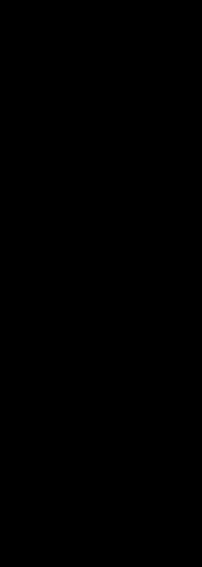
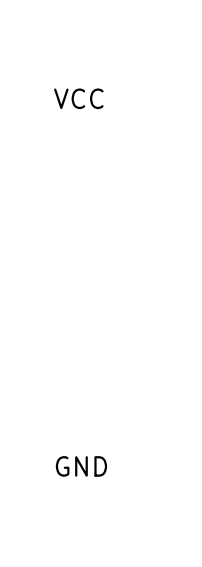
label: none -> VCC (78, 98)
label: none -> GND (81, 466)

